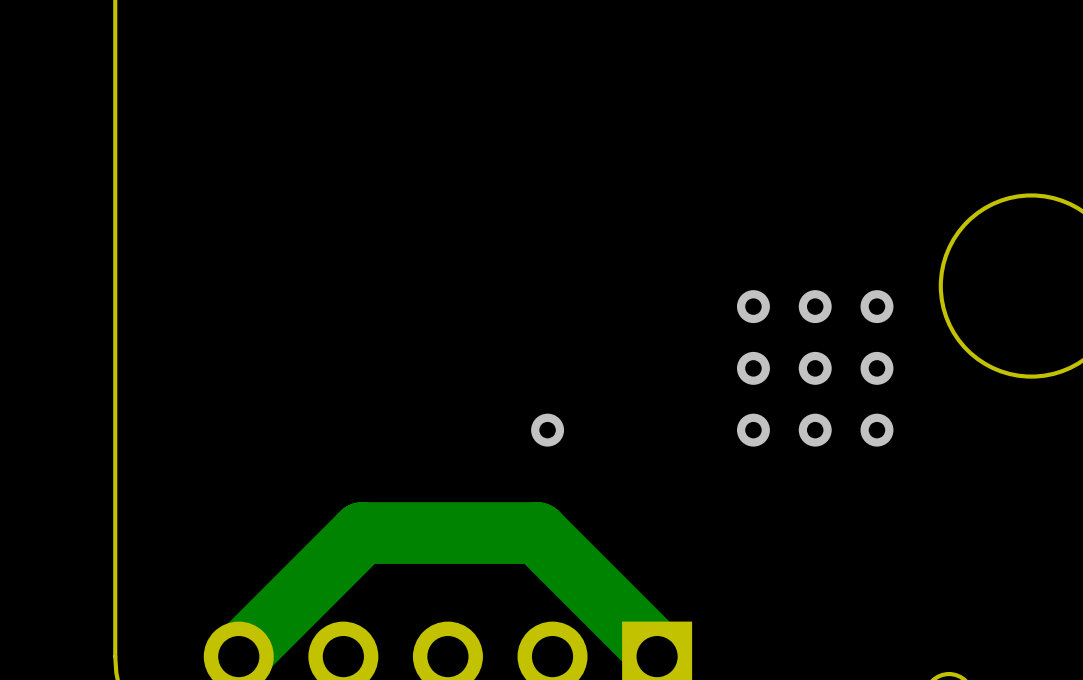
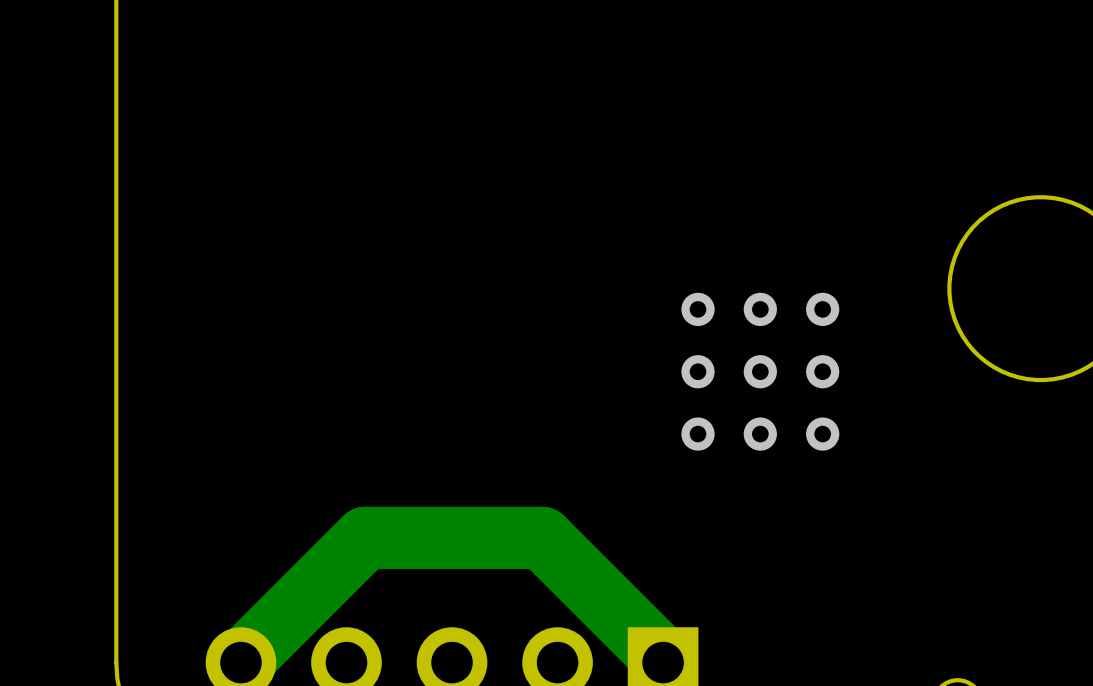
via: none -> (698, 309)
via: (876, 306) -> none
via: none -> (698, 371)
via: (876, 368) -> none
via: (547, 430) -> none
via: none -> (698, 434)
via: (876, 430) -> none

